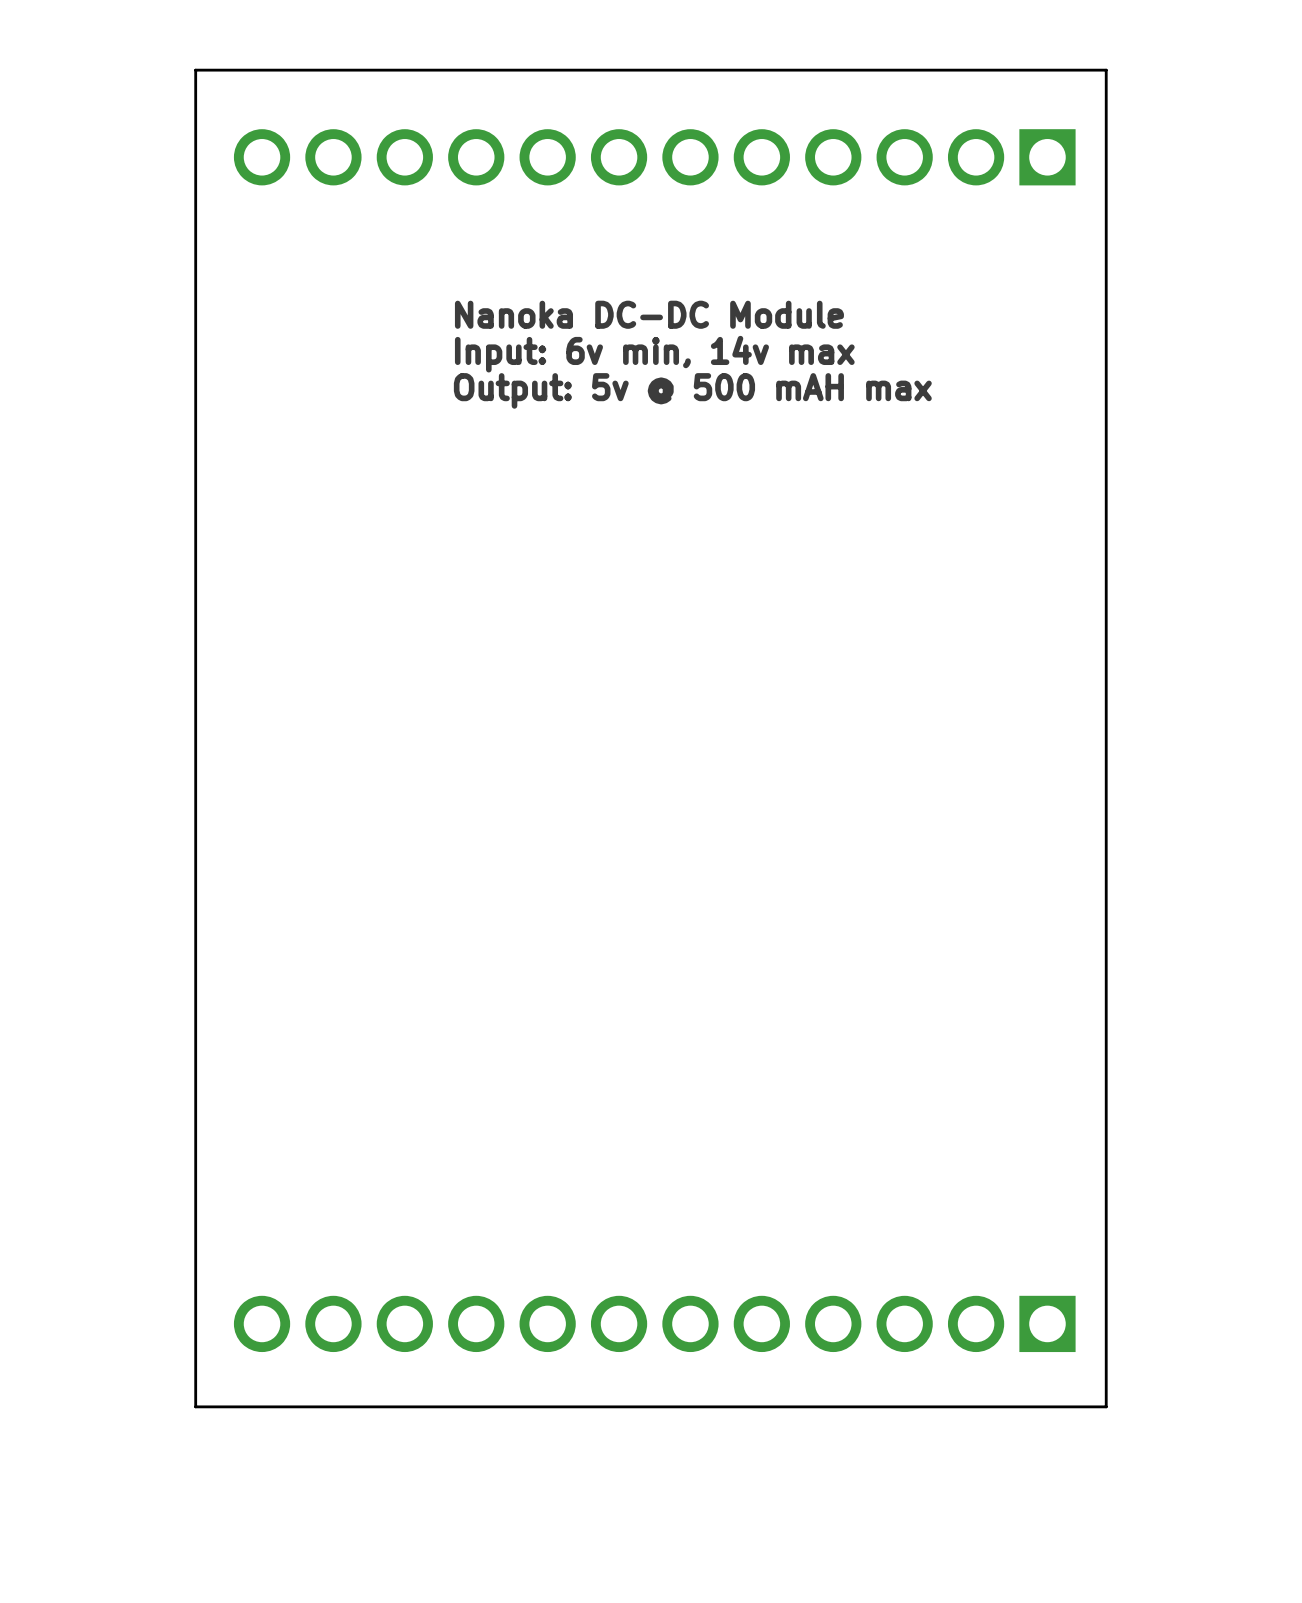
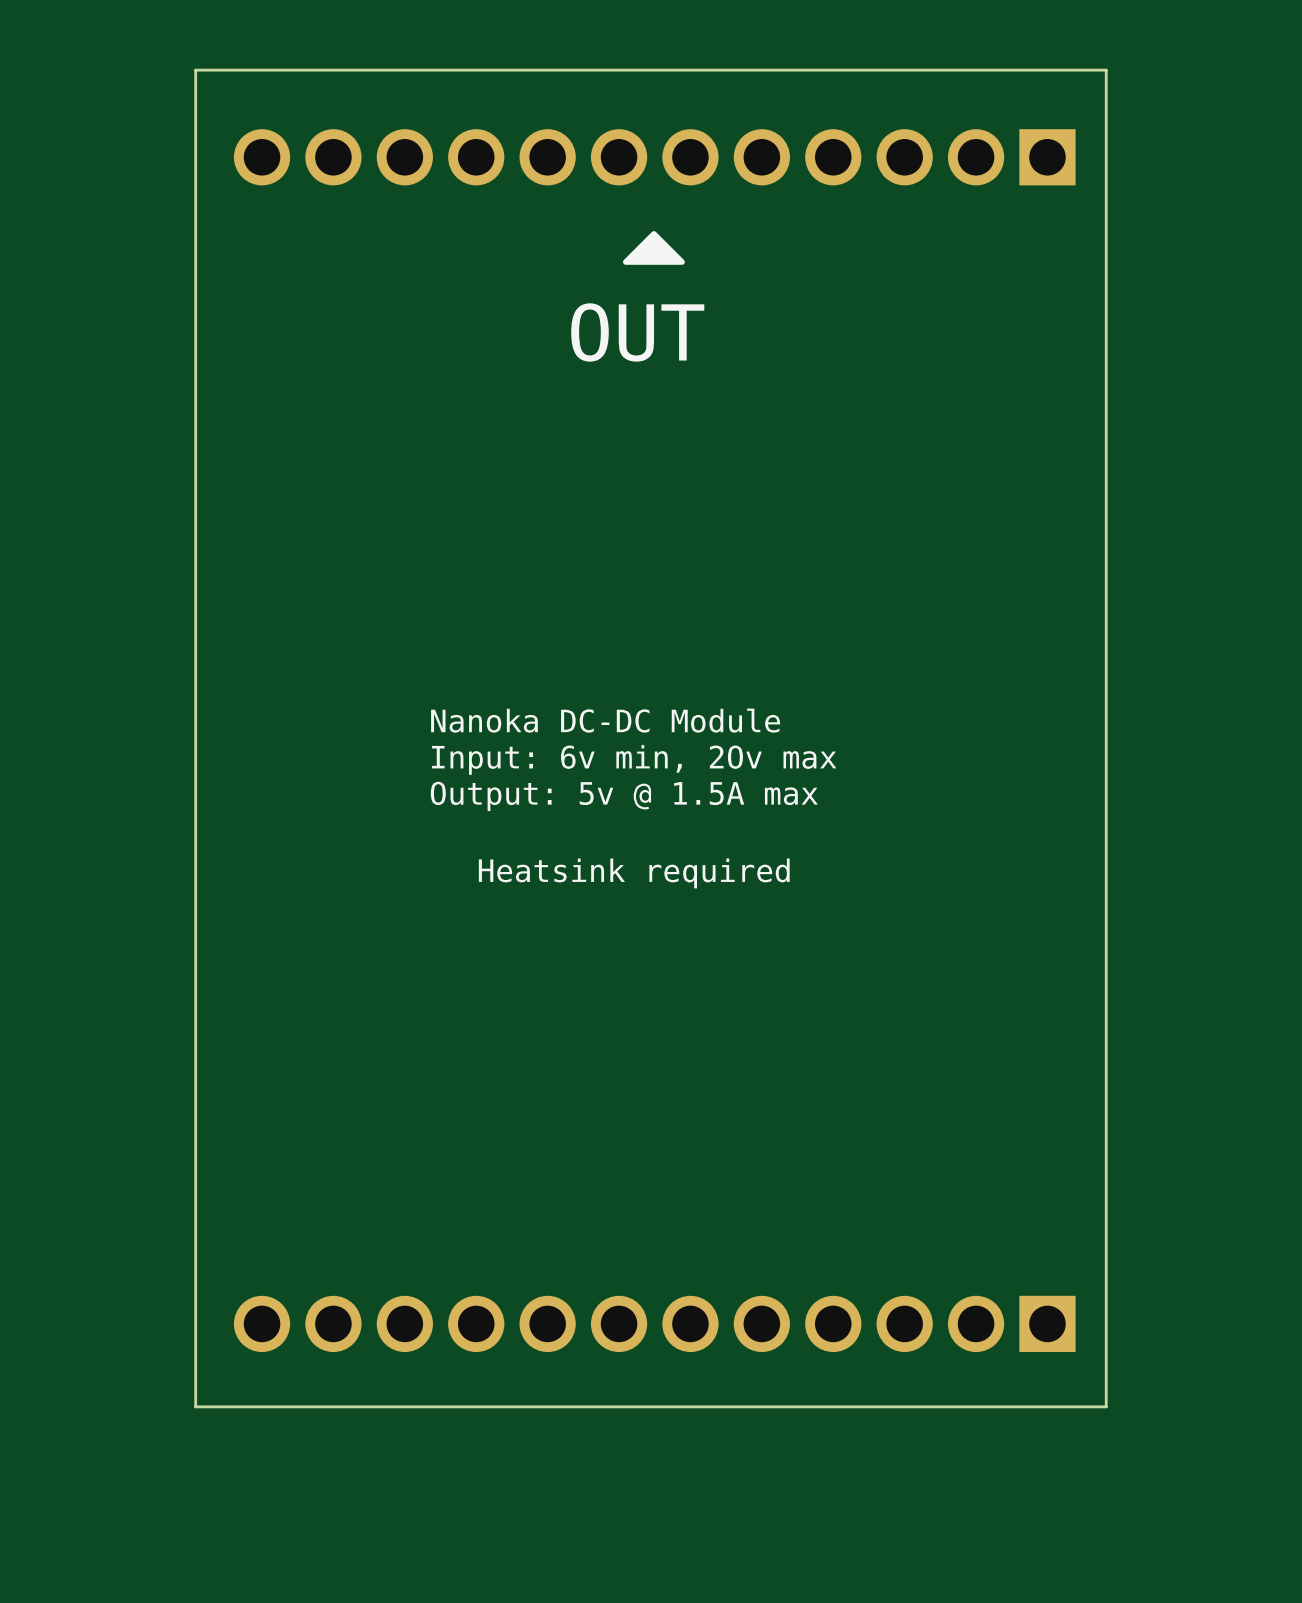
drawing: none -> [622, 231, 685, 265]
text position: Nanoka DC-DC Module (649, 314) -> Nanoka DC-DC Module (605, 720)
text: none -> OUT (637, 332)
text: Input: 6v min, 14v max (654, 354) -> none
text: Output: 5v @ 500 mAH max (692, 390) -> none
text: none -> Input: 6v min, 2Ov max (634, 759)
text: none -> Output: 5v @ 1.5A max (624, 796)
text: none -> Heatsink required (634, 873)

